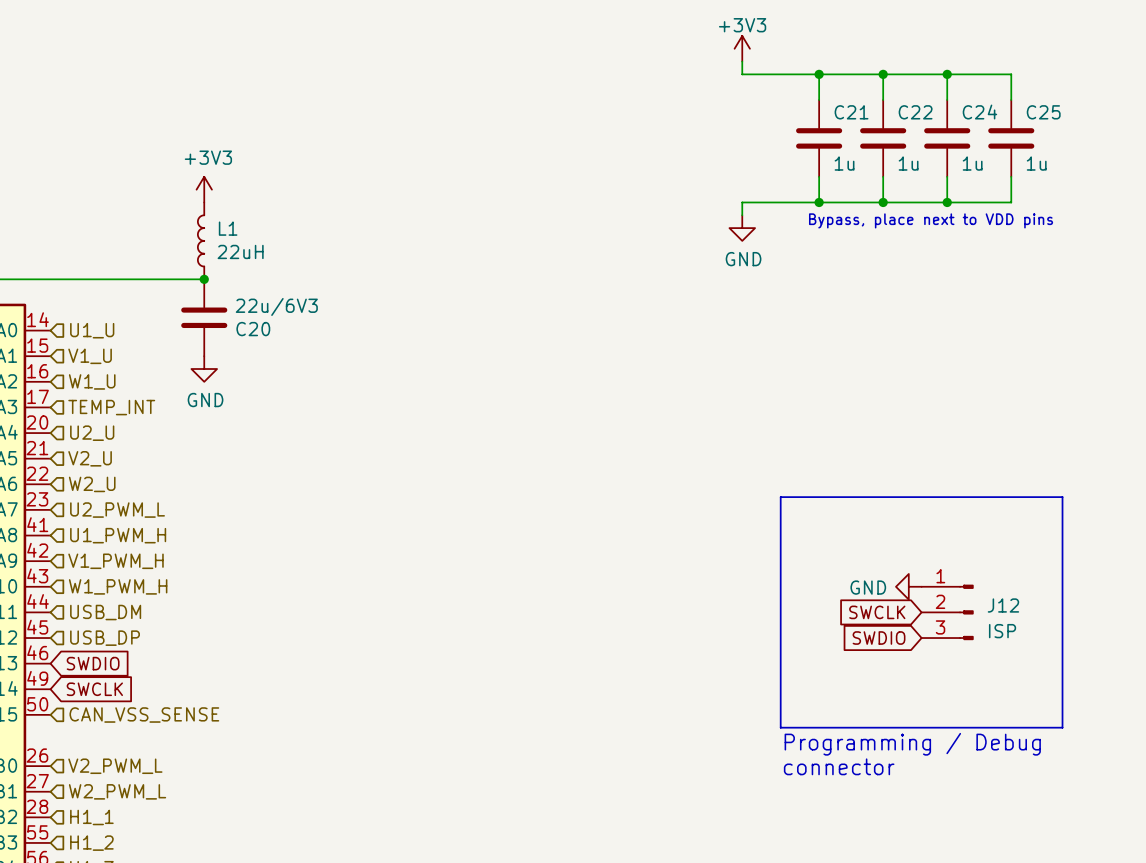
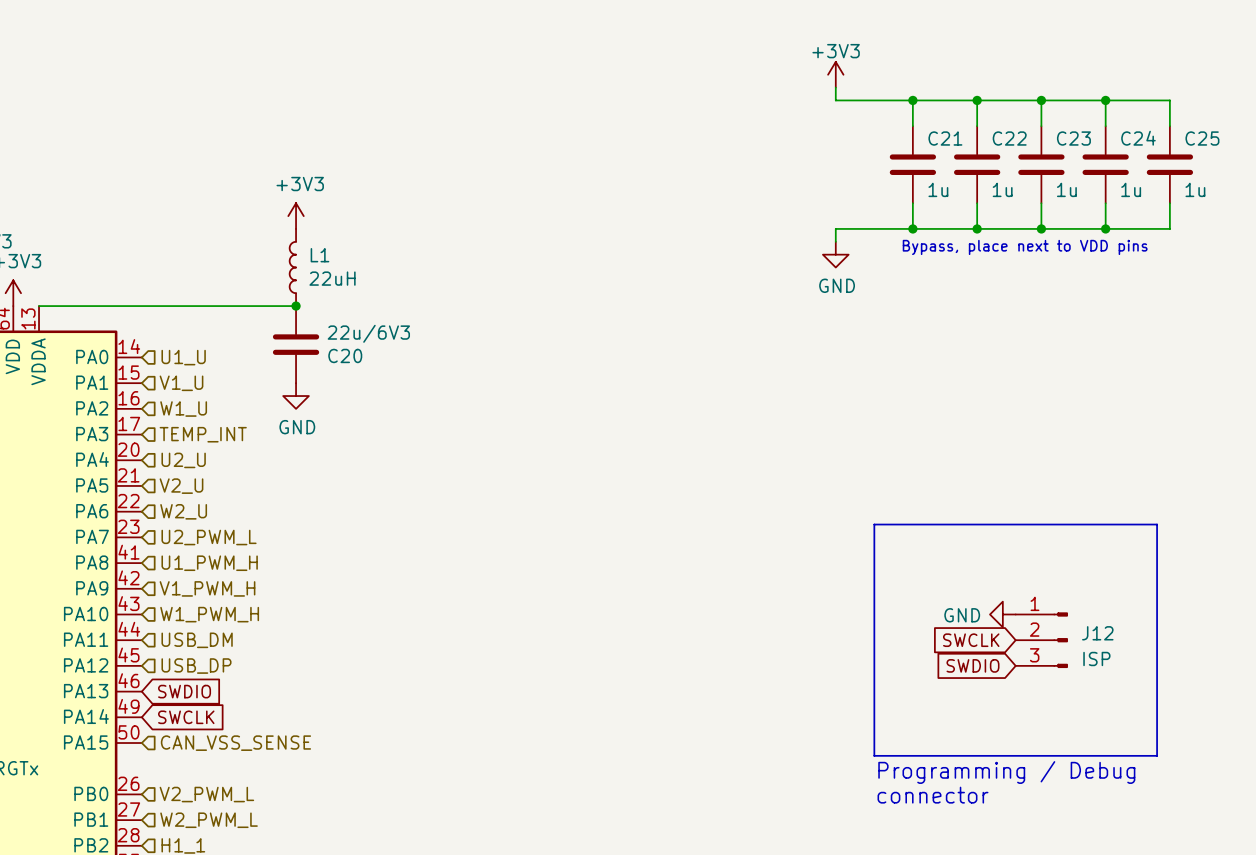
wire: none -> (1105, 100) (1169, 100) (1169, 126)
junction: none -> (1105, 100)
C24 name: C24 (979, 112) -> C23 (1073, 138)
C25 name: C25 (1043, 112) -> C24 (1138, 138)
C25: none -> 1u (1169, 164)
wire: none -> (1169, 203) (1169, 228) (1105, 228)
junction: none -> (1105, 228)

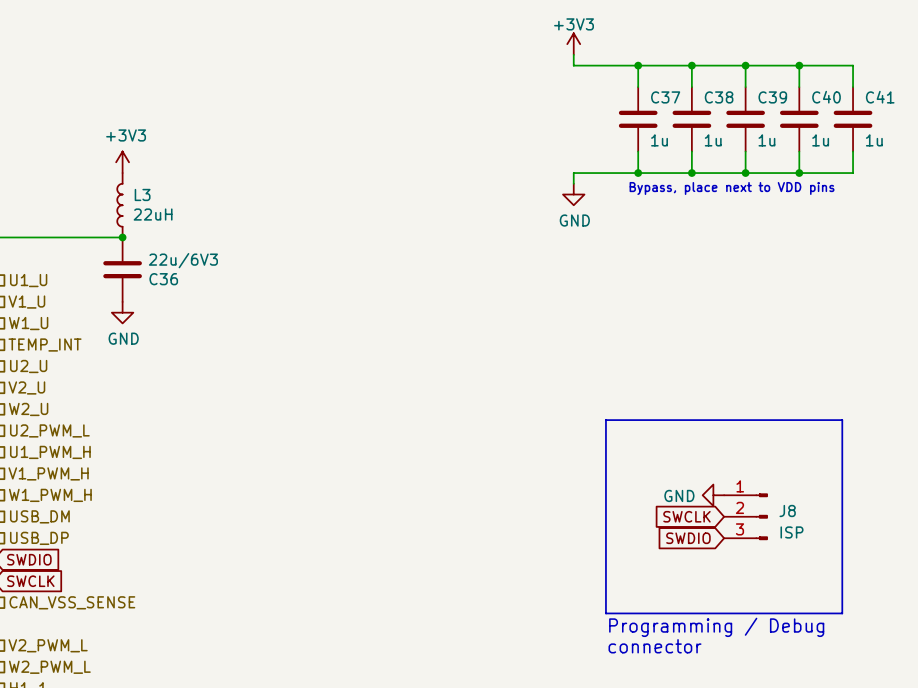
C21 name: C21 (945, 138) -> C37 (665, 97)
C22 name: C22 (1009, 138) -> C38 (719, 97)
C23 name: C23 (1073, 138) -> C39 (772, 97)
C24 name: C24 (1138, 138) -> C40 (826, 97)
C25 name: C25 (1202, 138) -> C41 (880, 97)
L1 name: L1 (319, 255) -> L3 (142, 194)
C20 name: C20 (345, 355) -> C36 (163, 279)
J12 name: J12 (1097, 633) -> J8 (787, 510)

